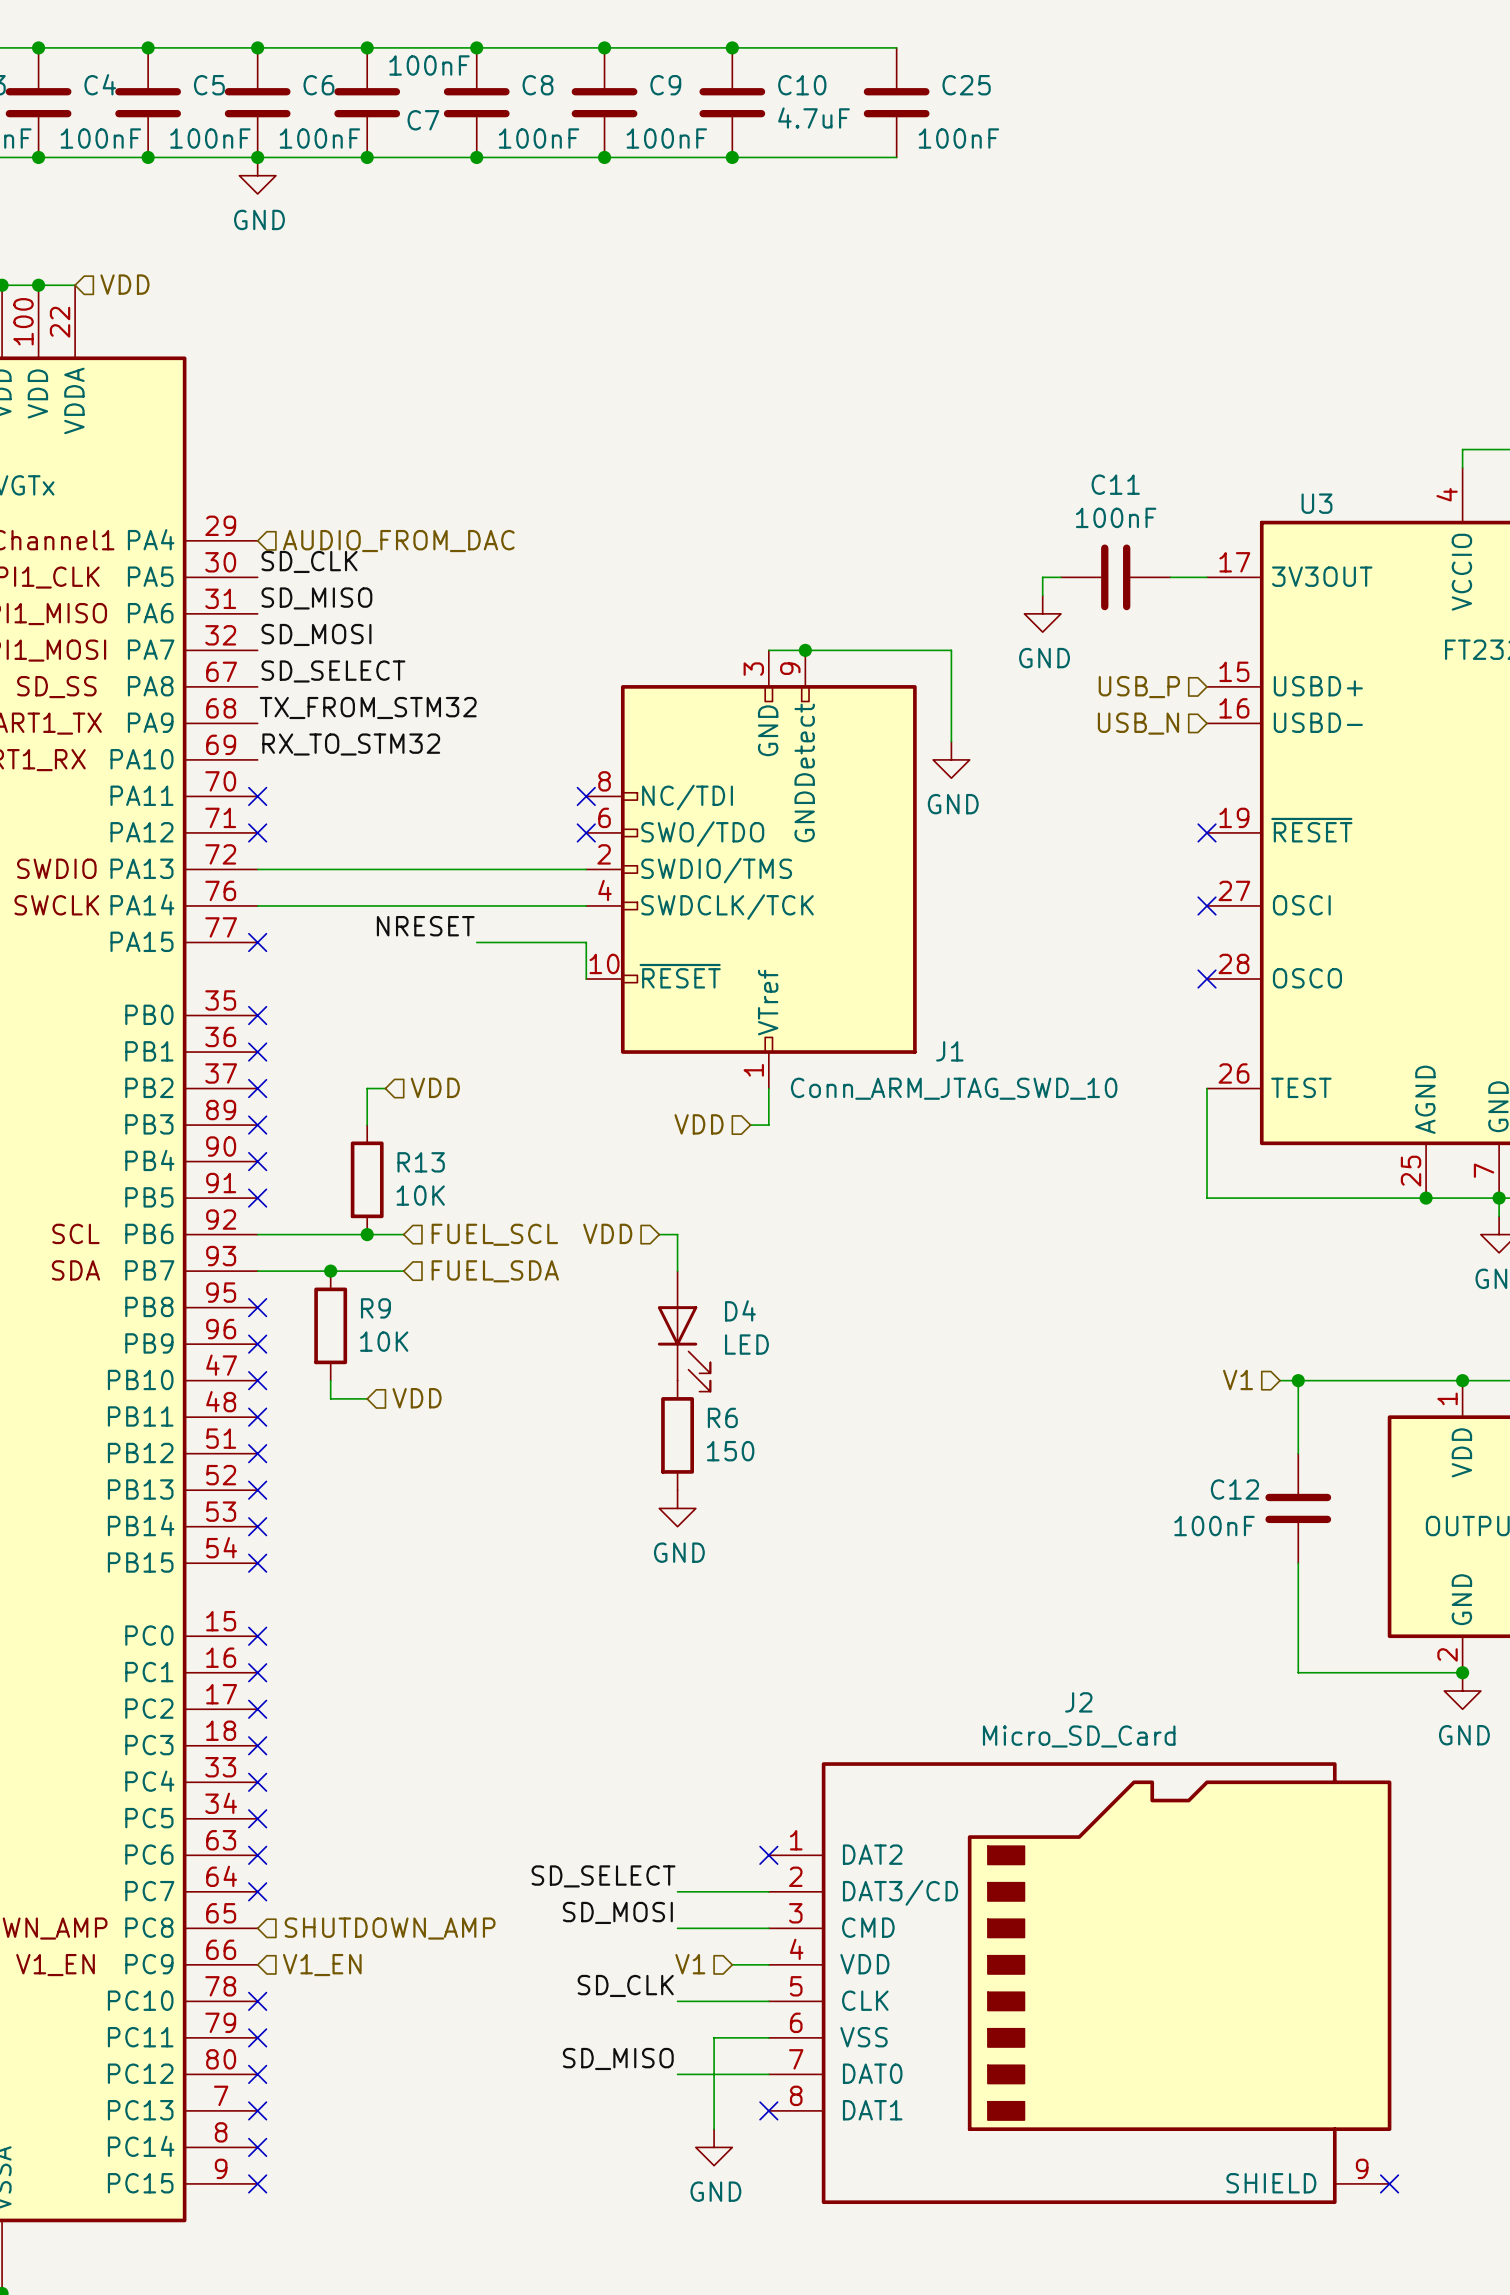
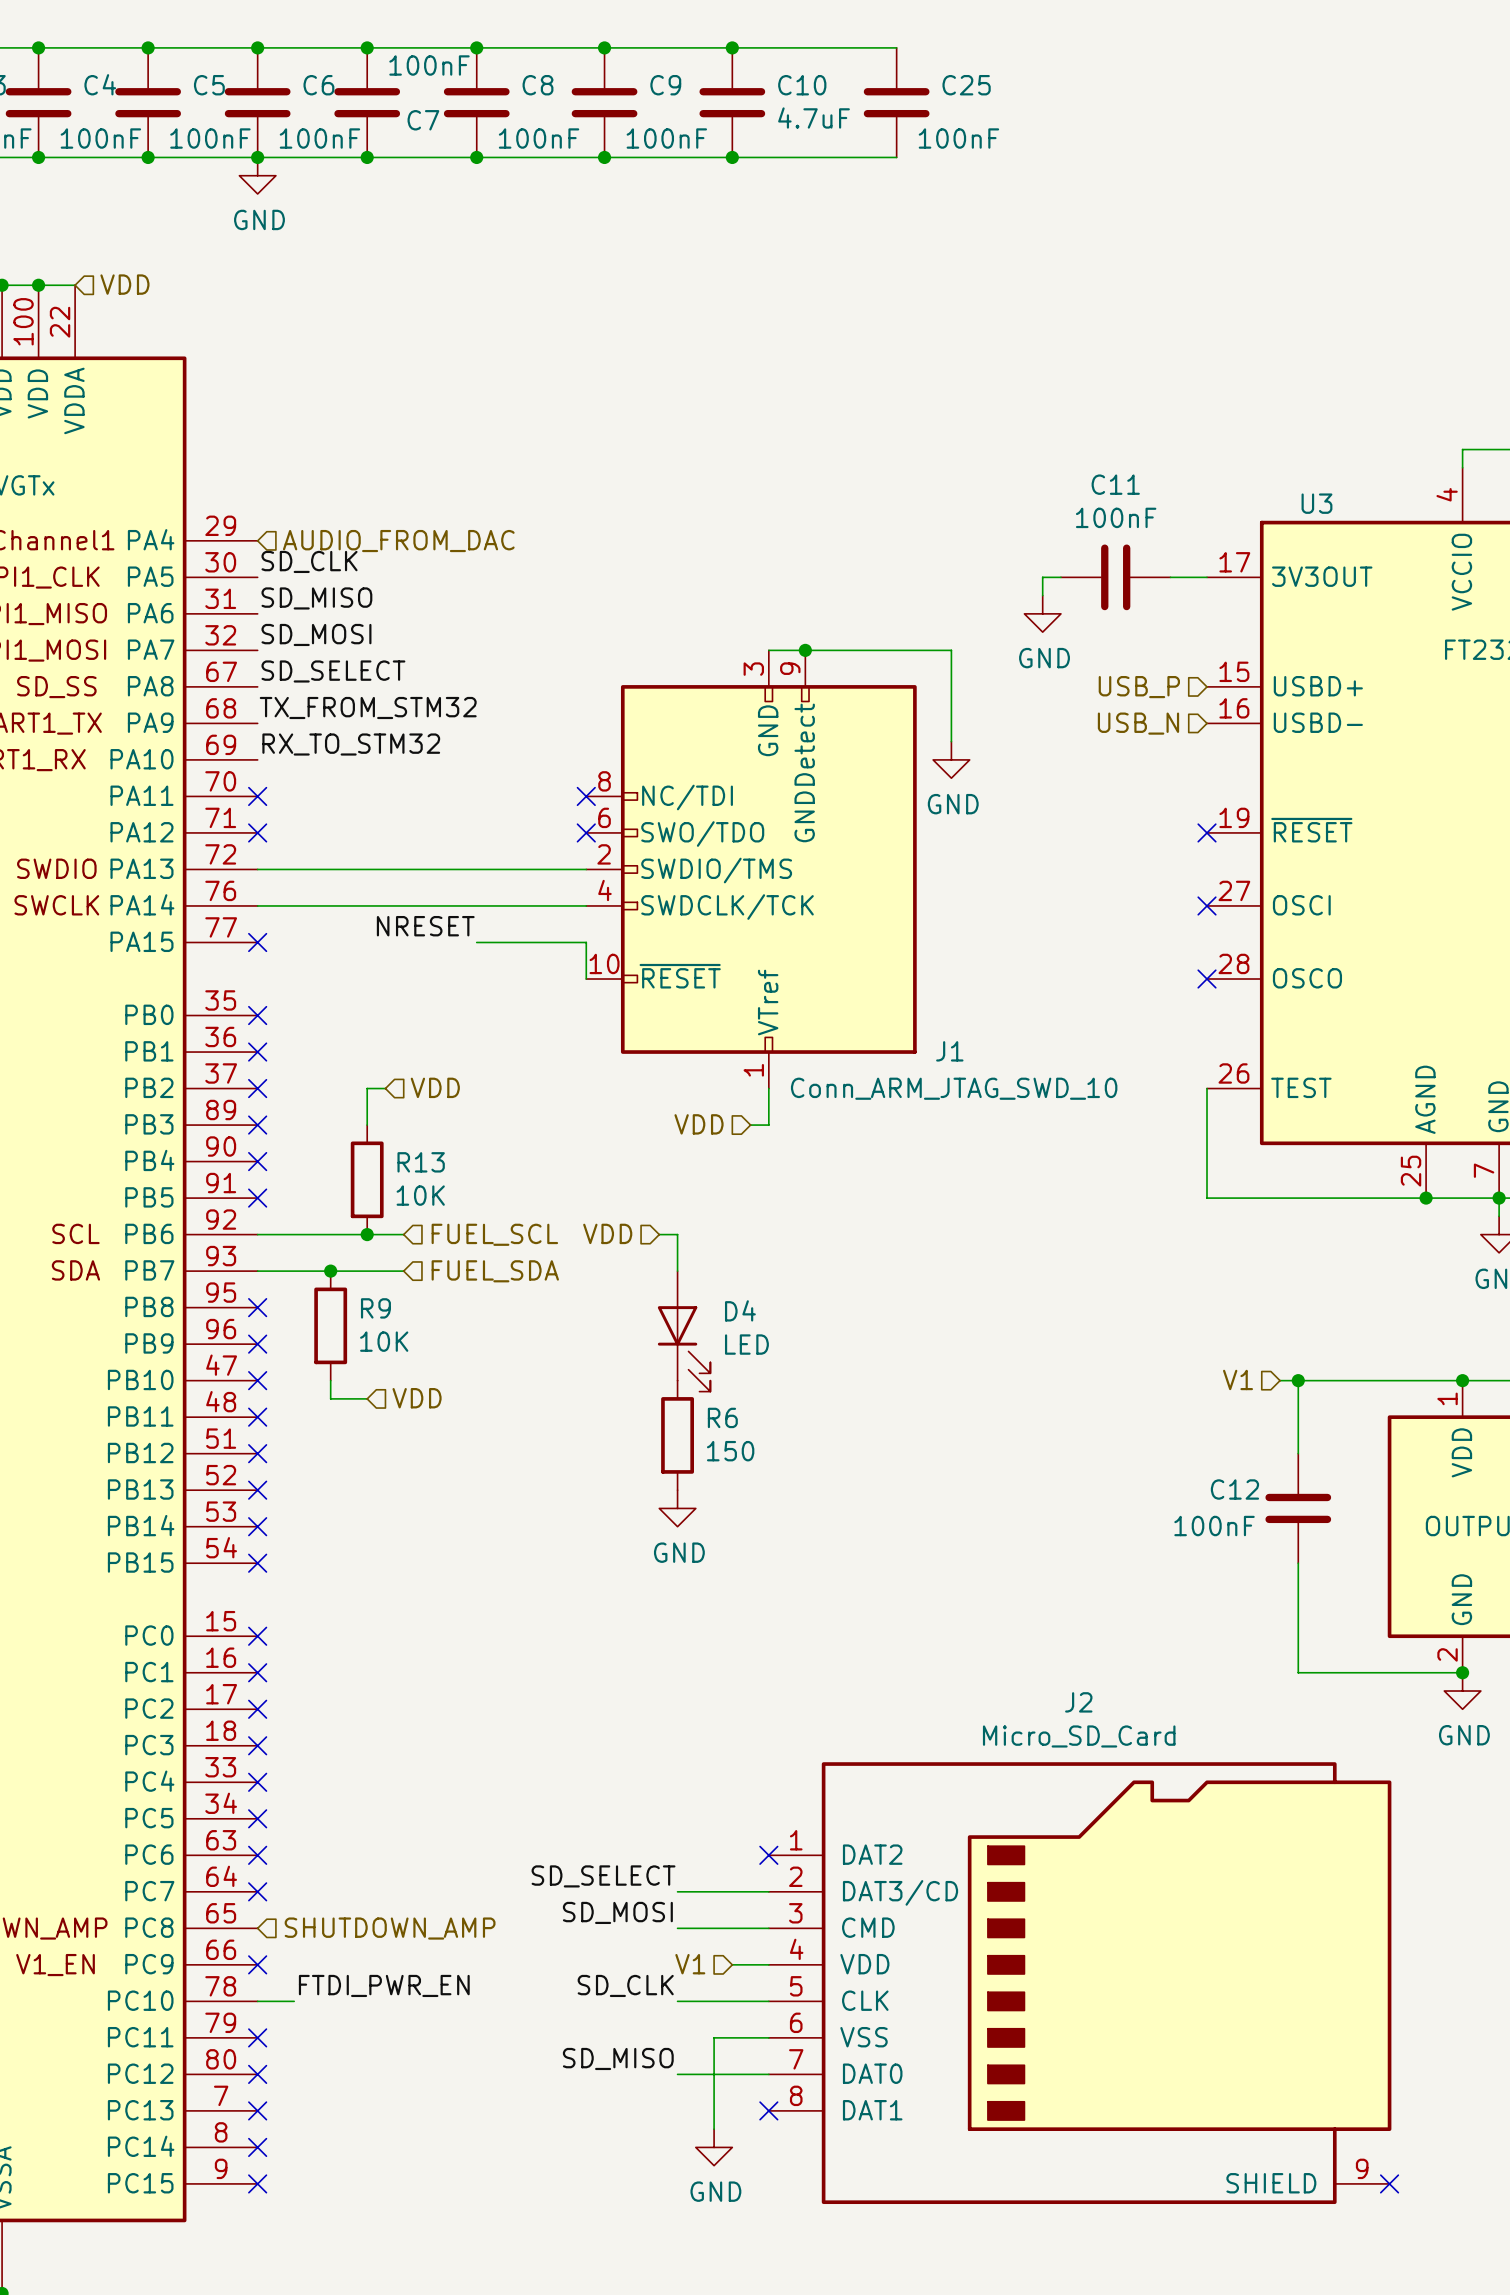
hierarchical label: V1_EN (322, 1965) -> none
label: none -> FTDI_PWR_EN (384, 1985)
wire: none -> (257, 2001) (294, 2001)
no-connect mark position: (257, 2001) -> (257, 1964)

